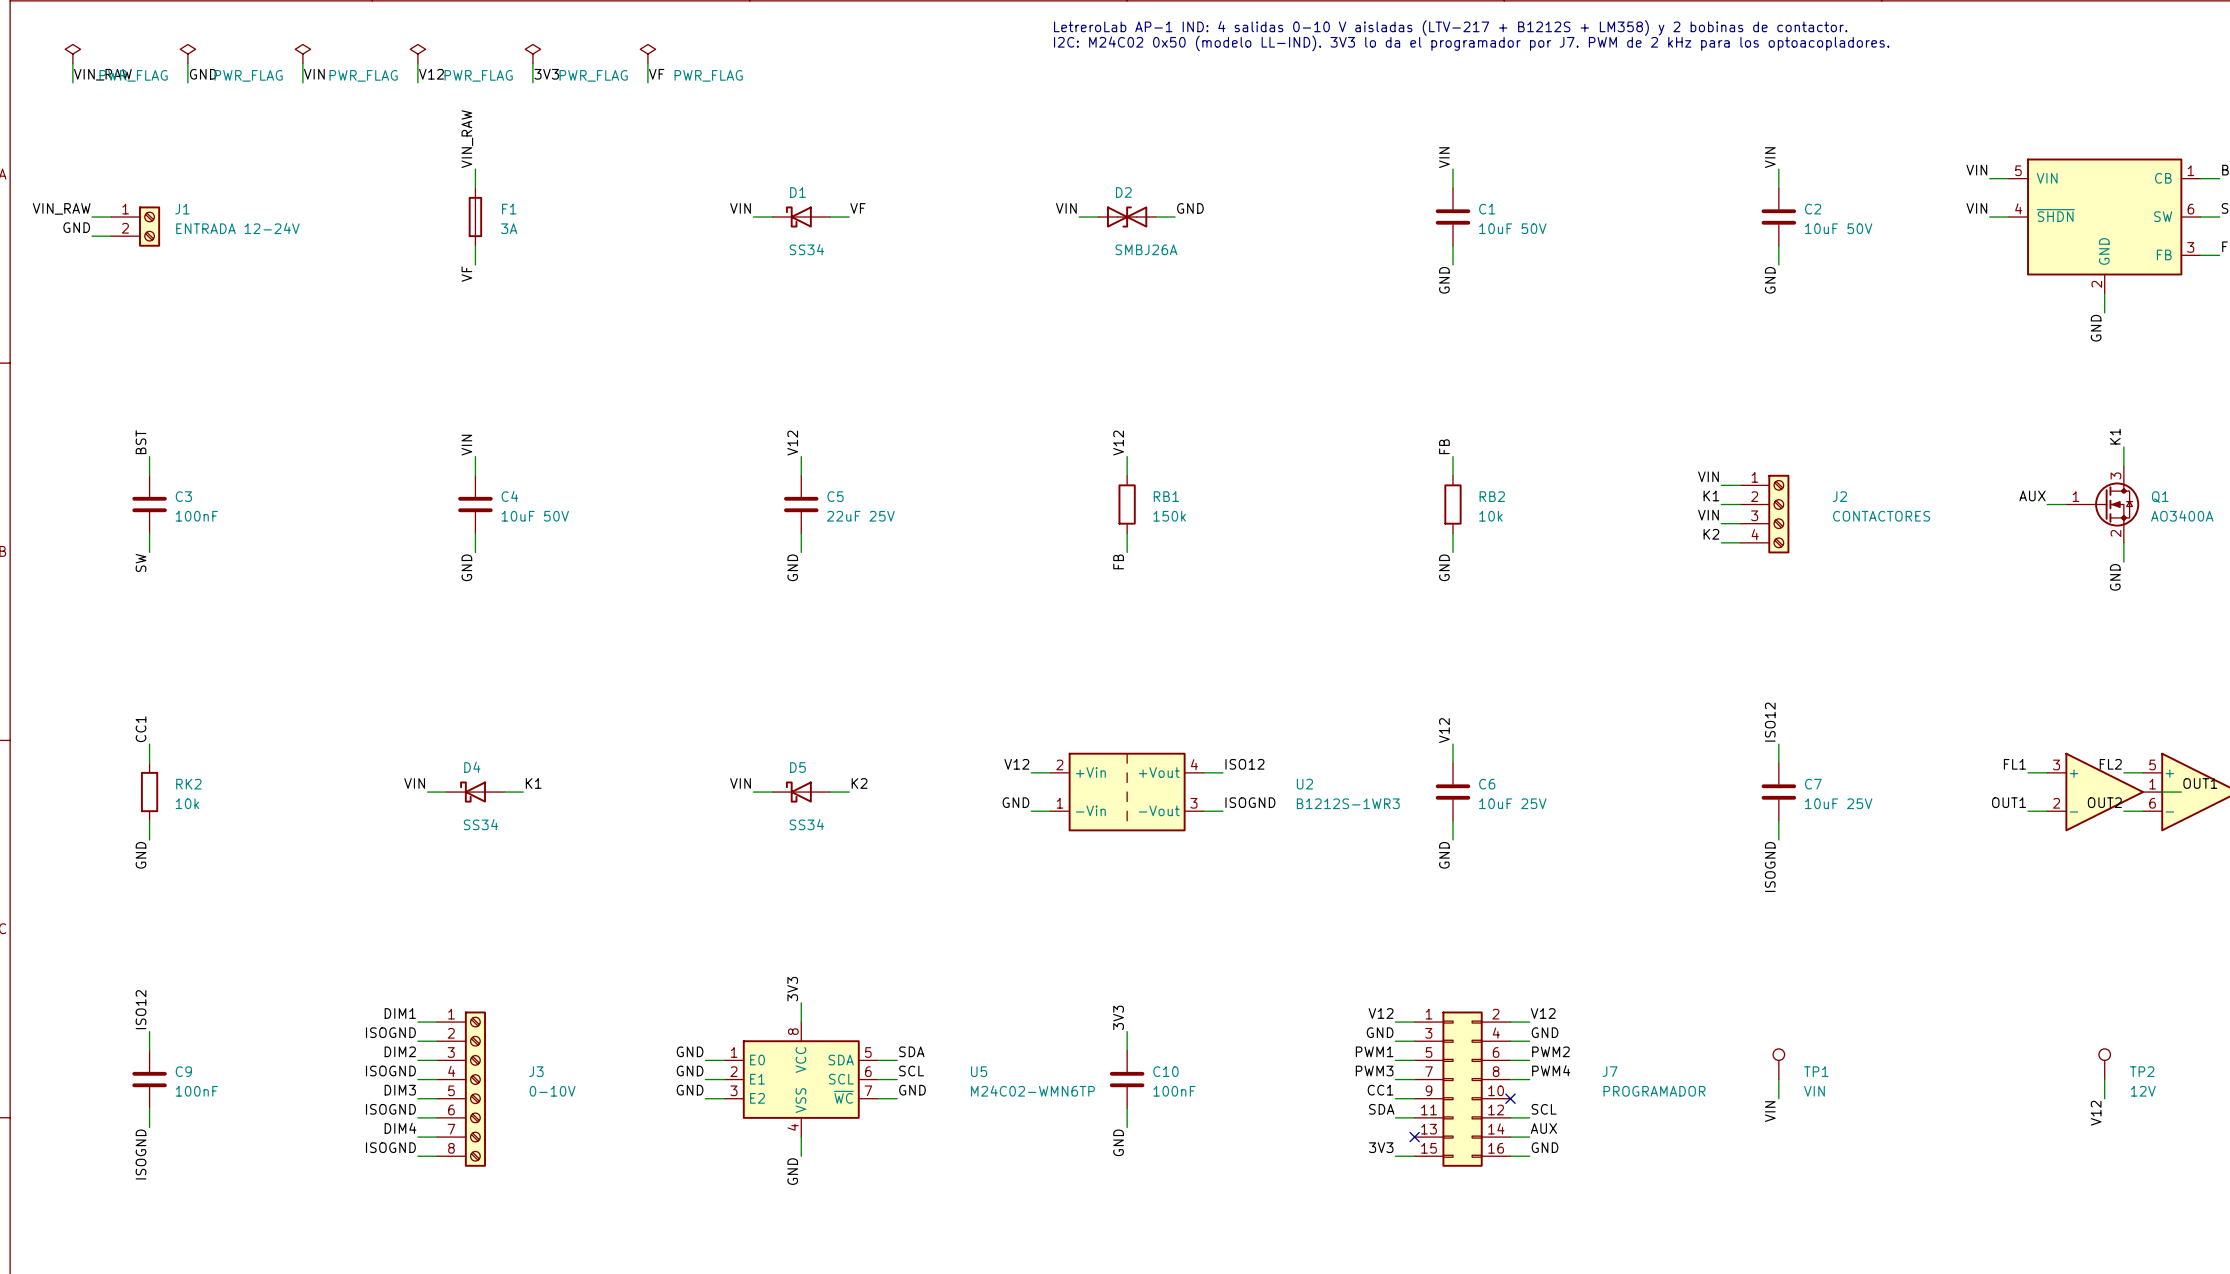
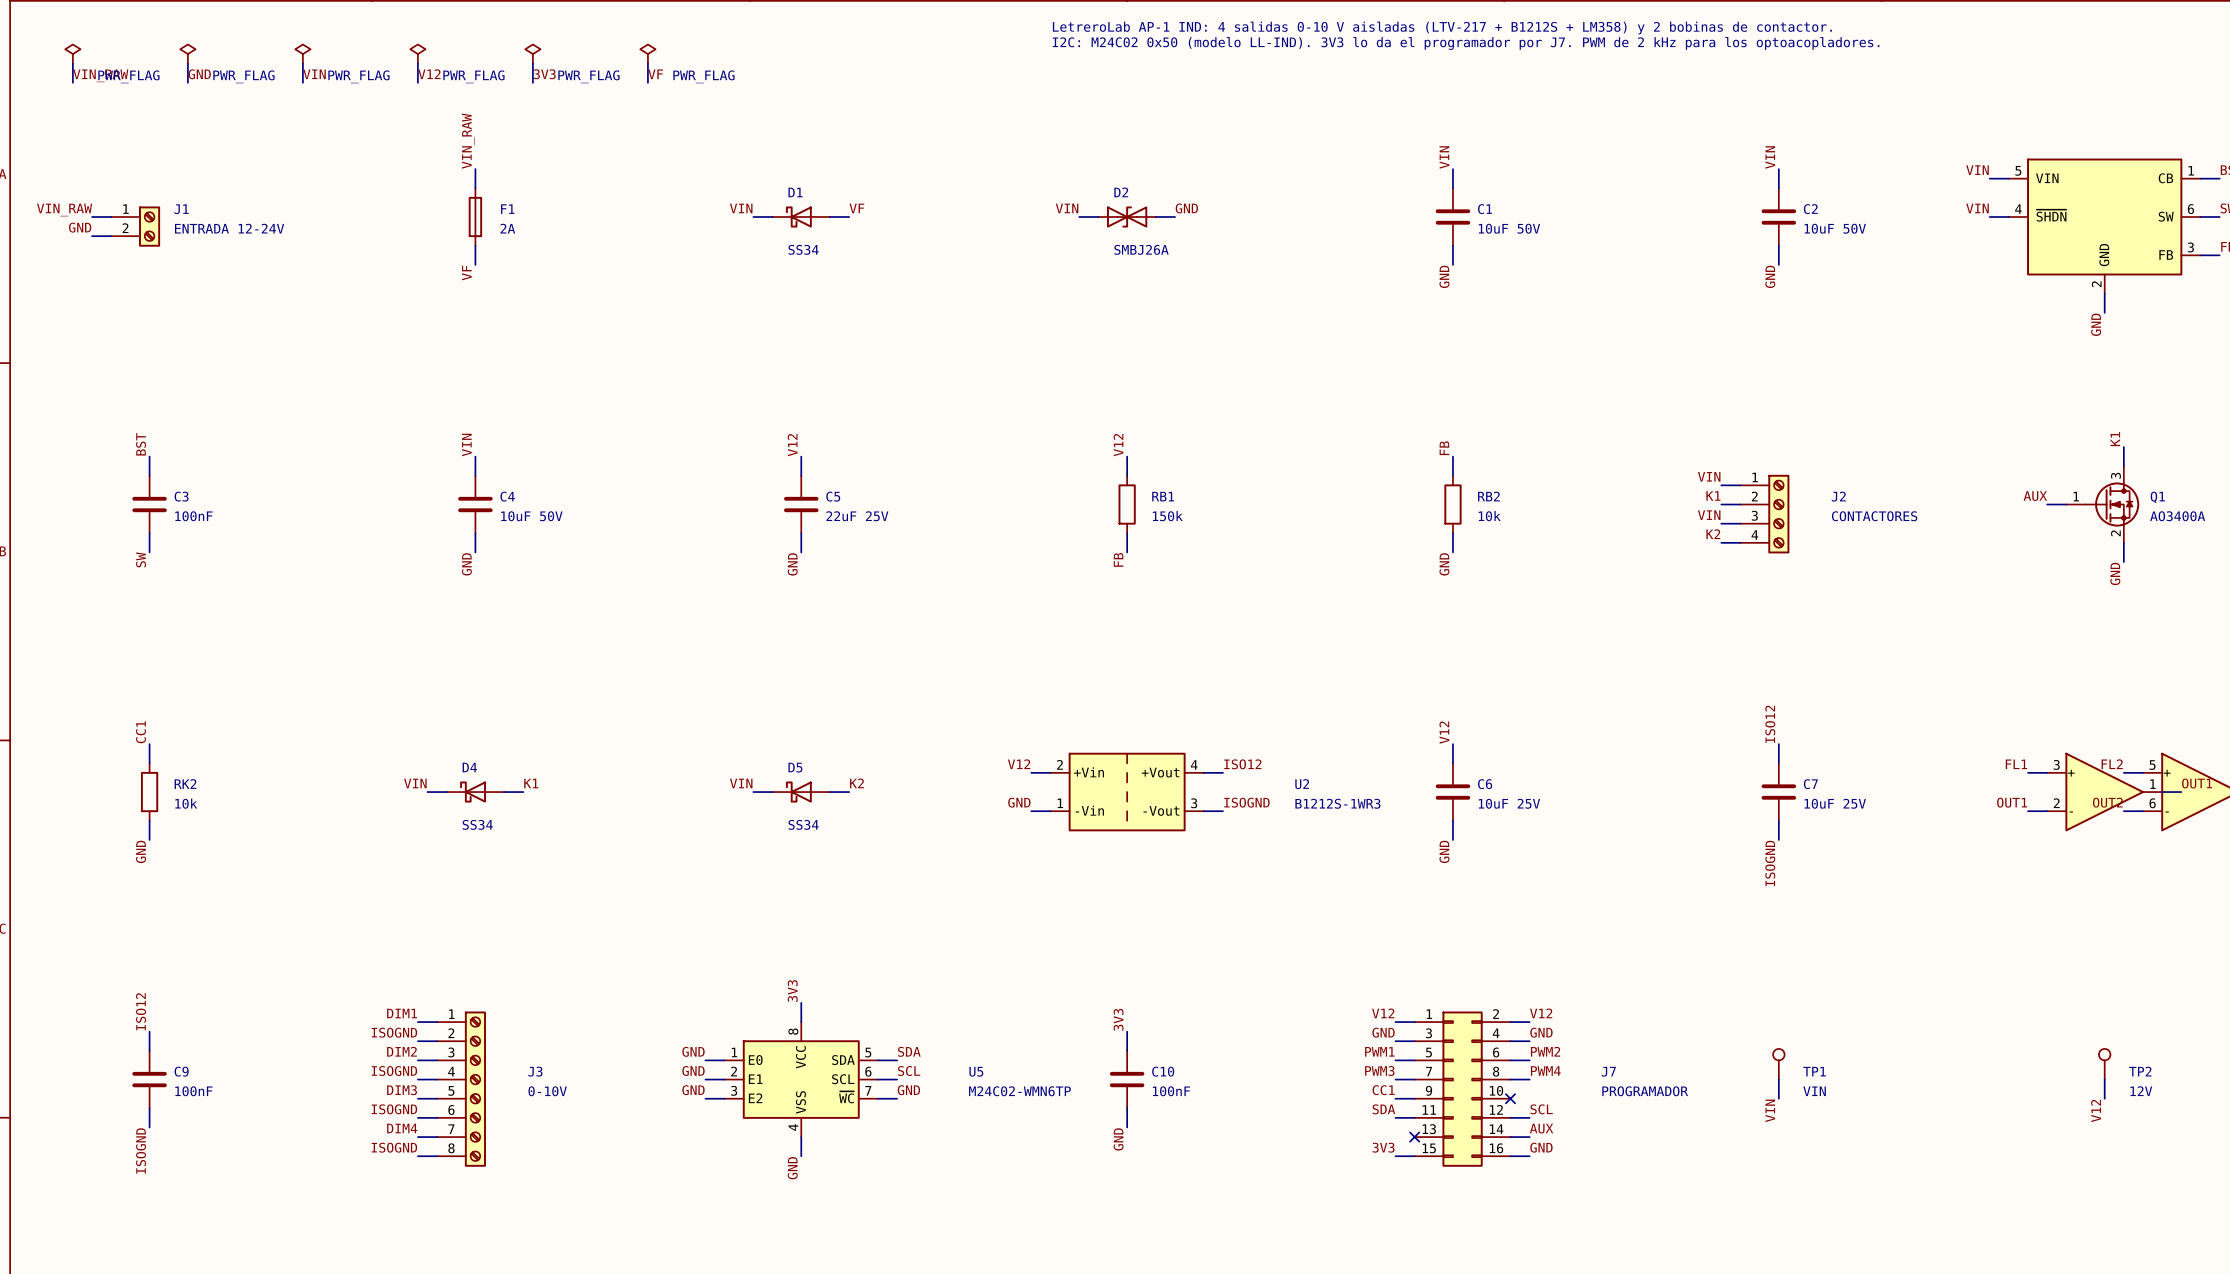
F1 value: 3A (509, 228) -> 2A (507, 228)

